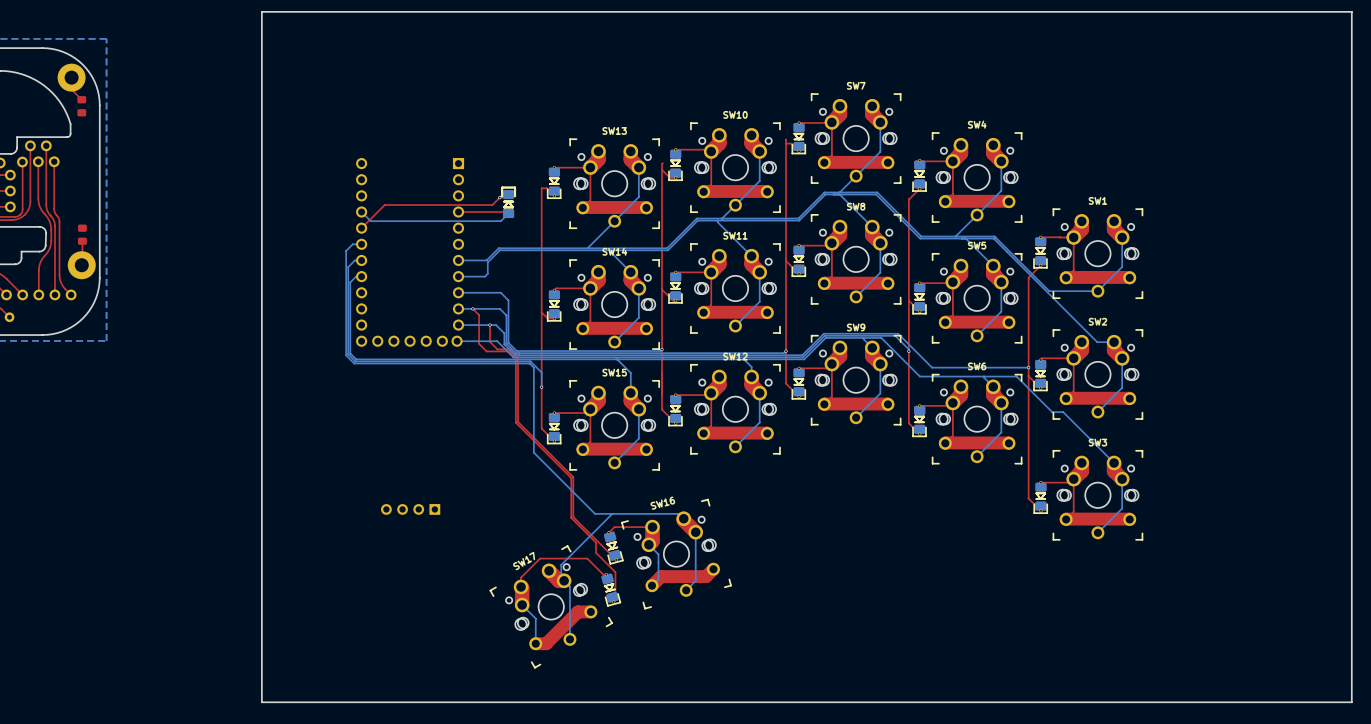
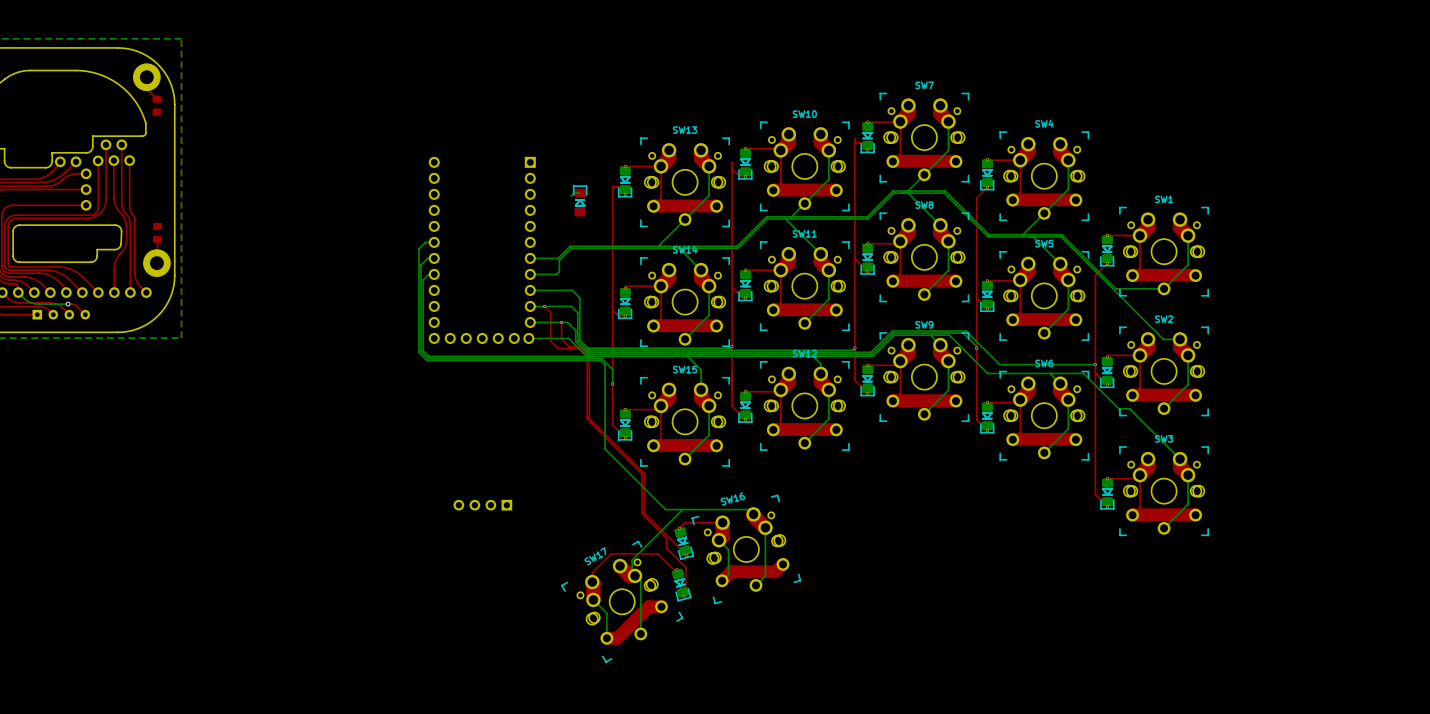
board edge: (1351, 11) (261, 11) (261, 702) (1351, 702) (1351, 11) -> none
top track: (508, 194) (505, 197) (499, 197) (492, 204) (384, 204) (361, 228) -> none
via: (499, 197) -> none
part: (508, 202) -> none
bottom track: (361, 212) (370, 221) (500, 221) (508, 213) -> none
top track: (458, 212) (508, 213) -> none

